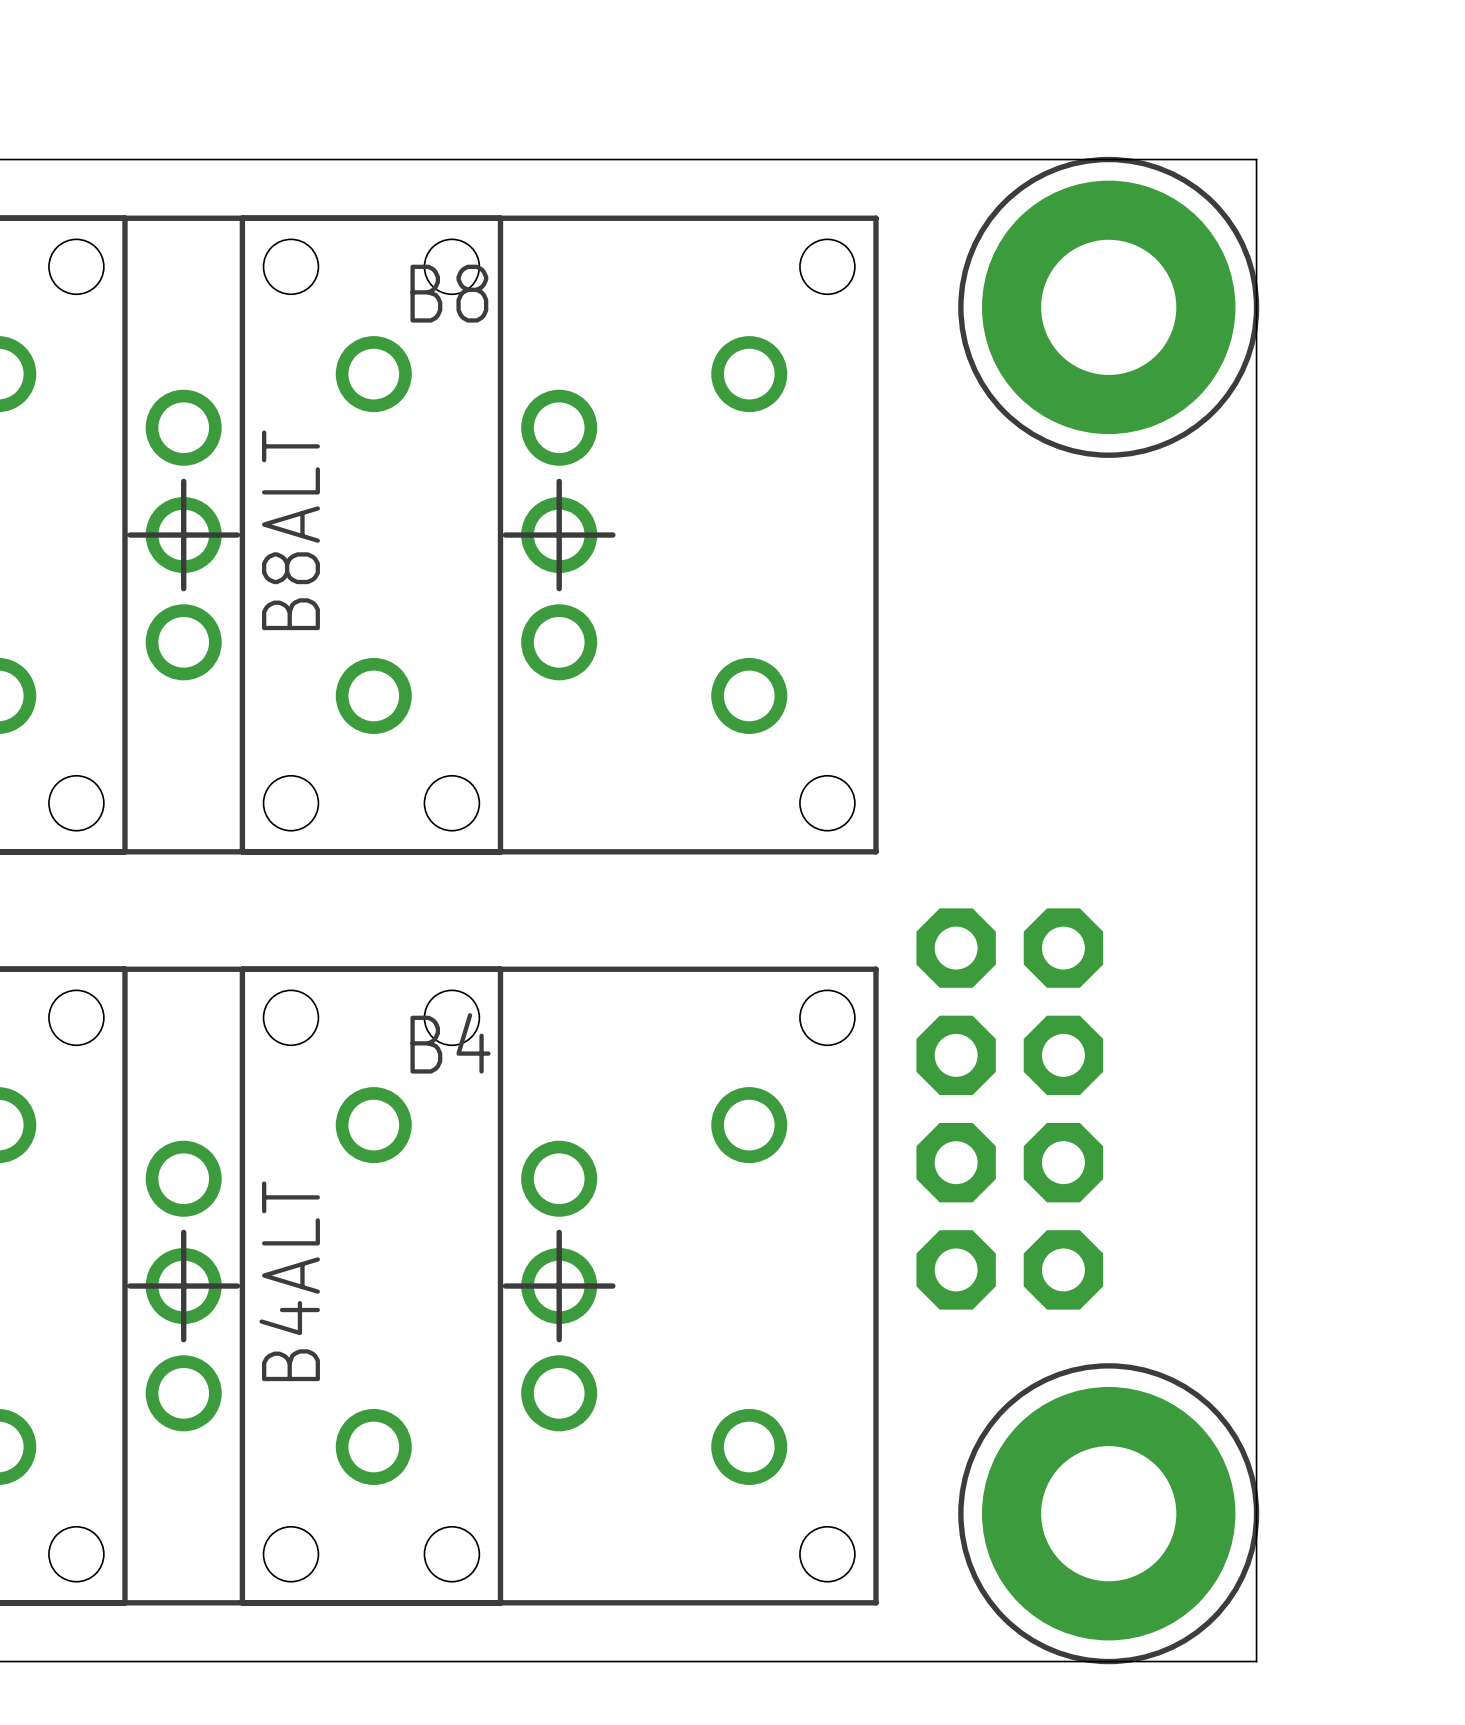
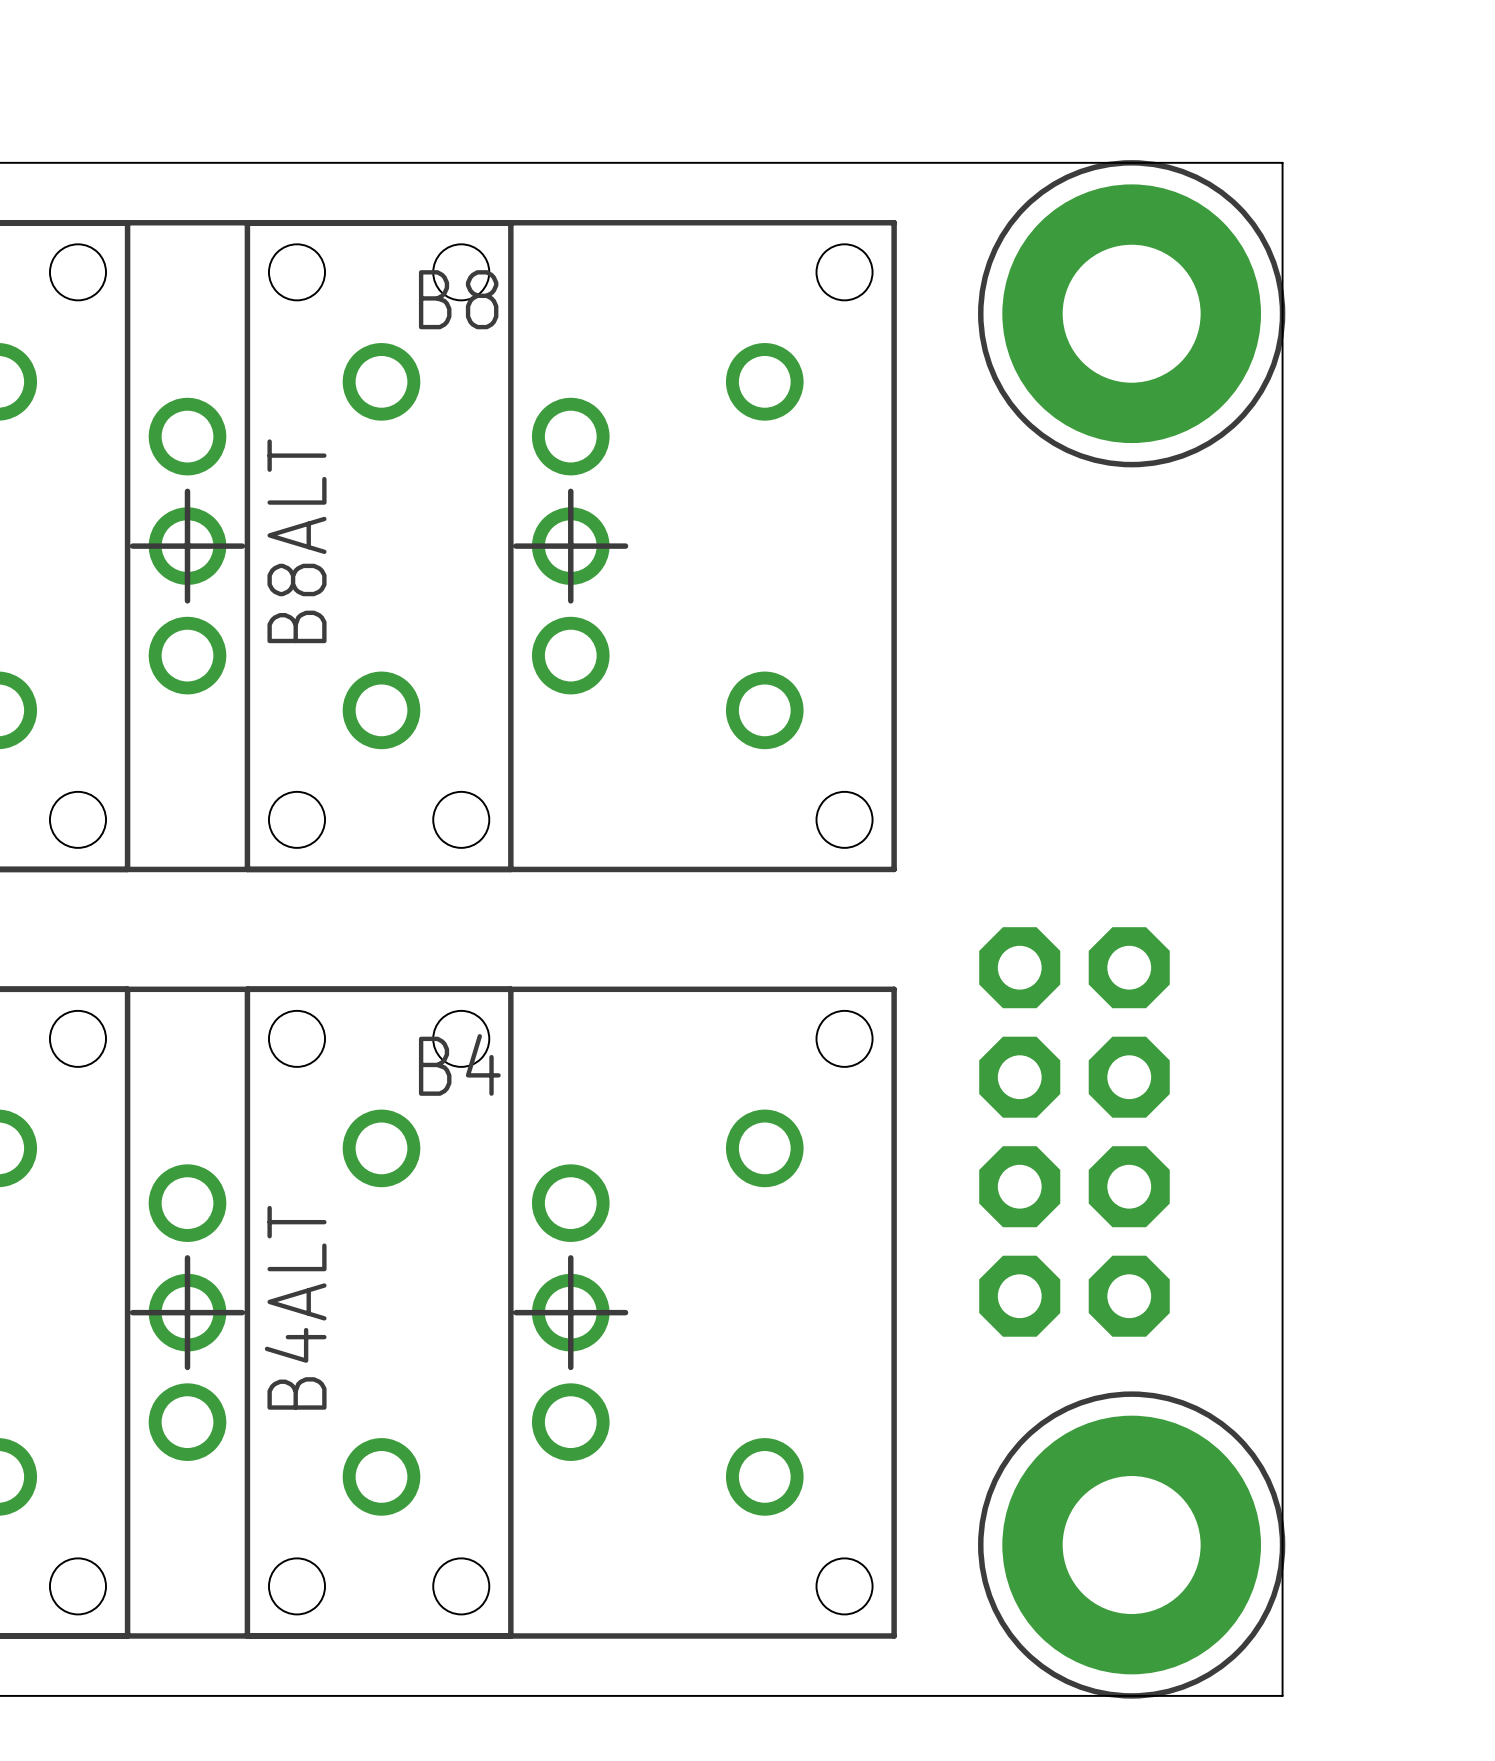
part position: (1009, 1109) -> (1074, 1131)

